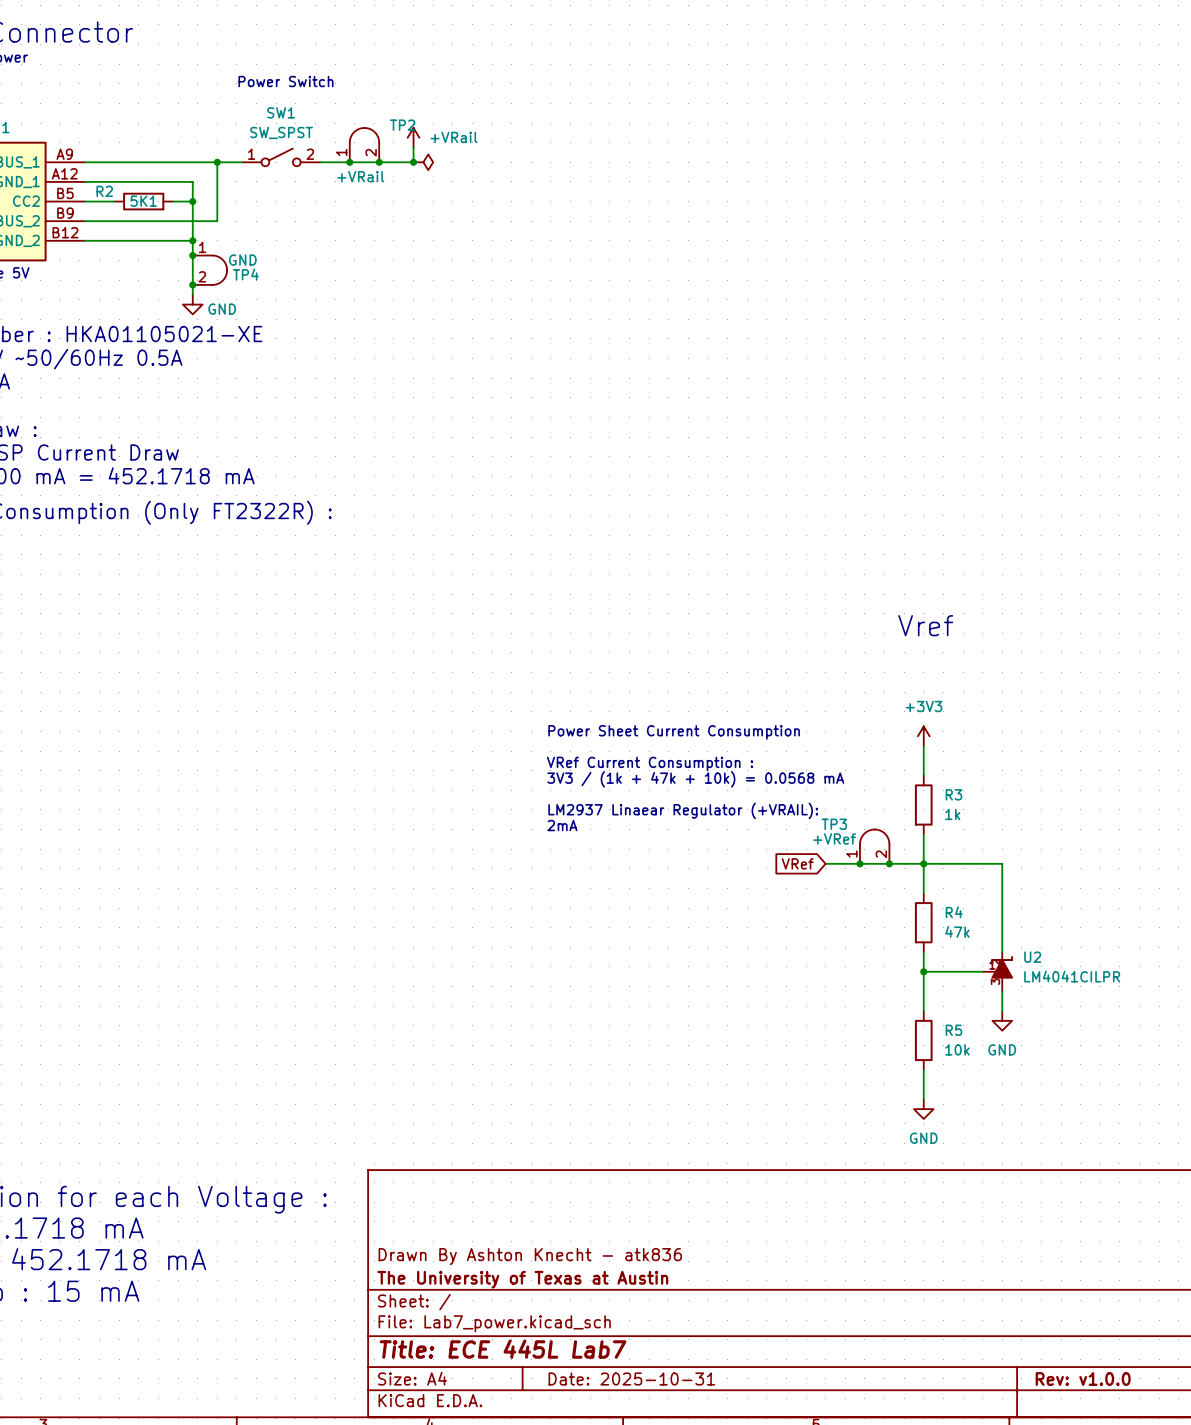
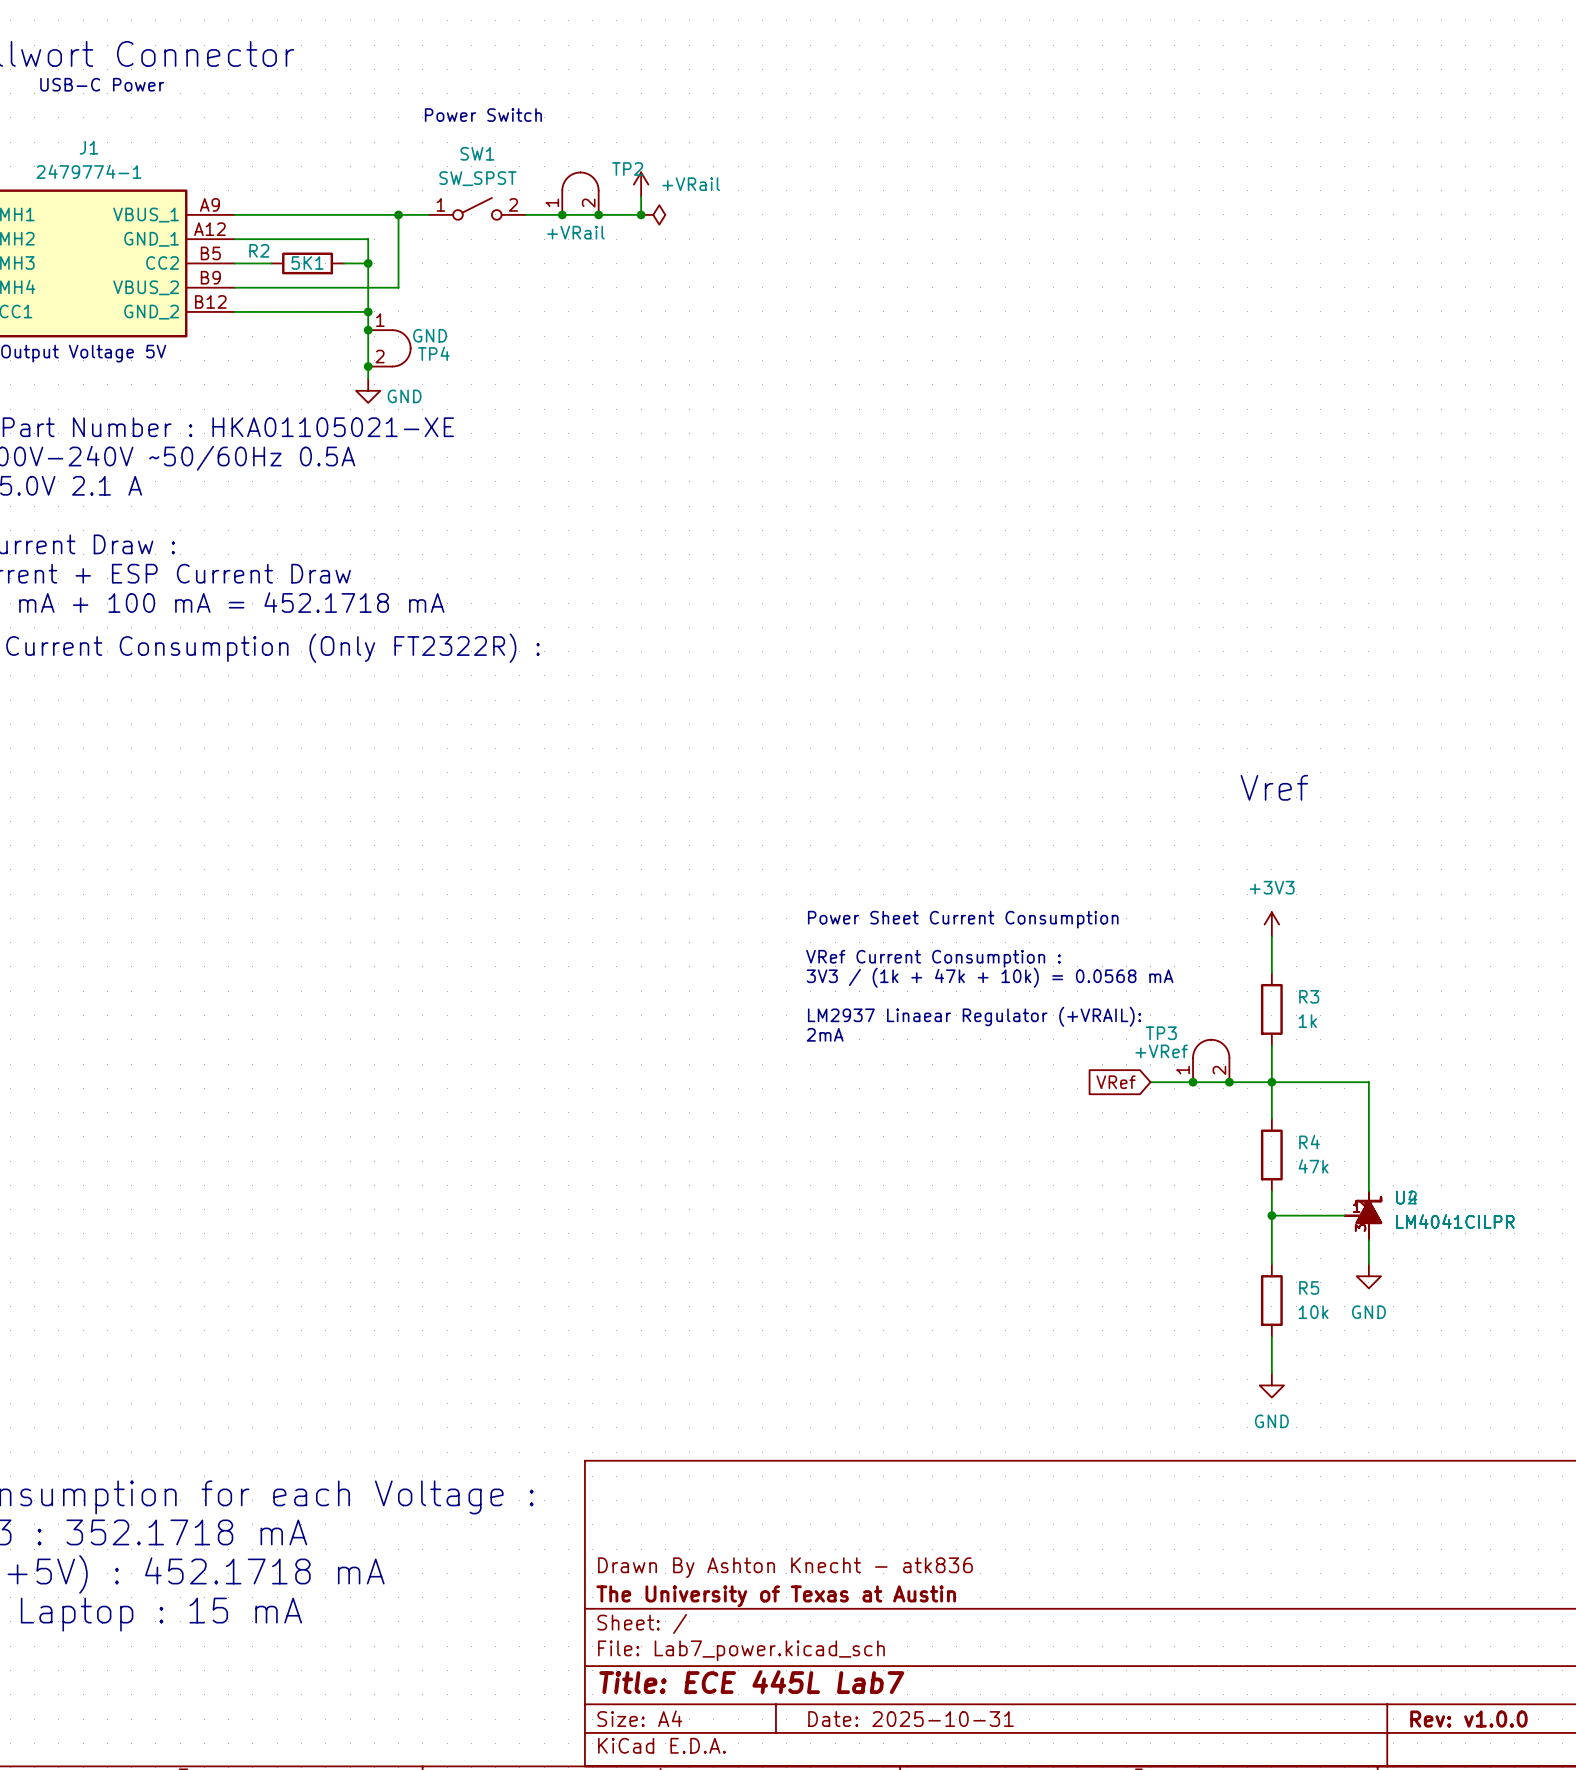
part: none -> LM4041CILPR (1363, 1215)

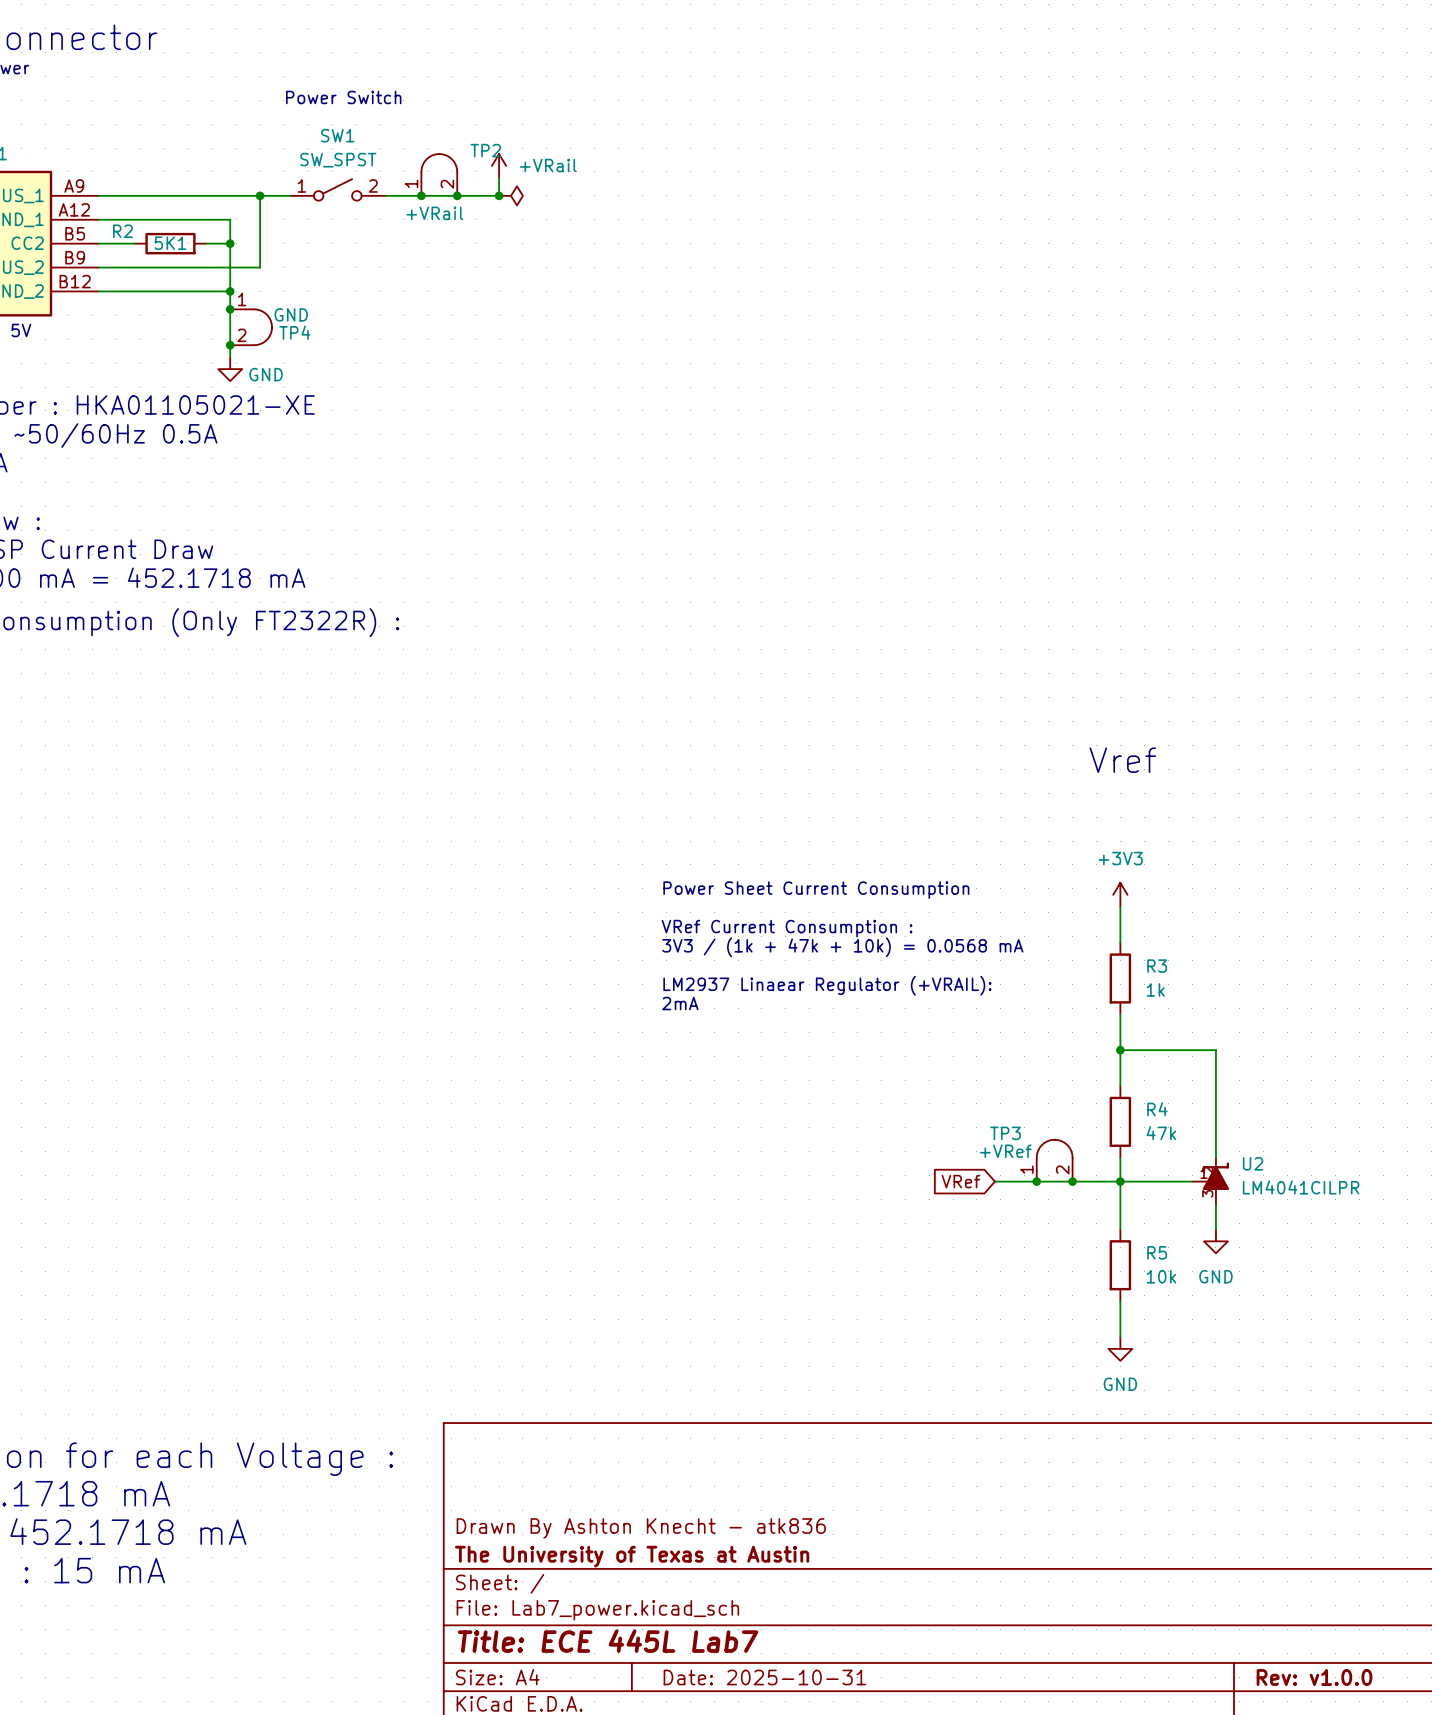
TP3 position: (1211, 1060) -> (1054, 1160)
global label position: VRef (1116, 1082) -> VRef (960, 1181)
wire: (1150, 1082) (1271, 1082) -> none
junction: (1193, 1082) -> none
junction: (1229, 1082) -> none
wire: none -> (994, 1181) (1120, 1181)
junction: none -> (1036, 1181)
junction: none -> (1072, 1181)
part: LM4041CILPR (1363, 1215) -> none

